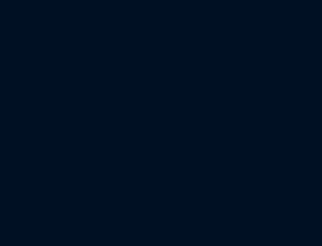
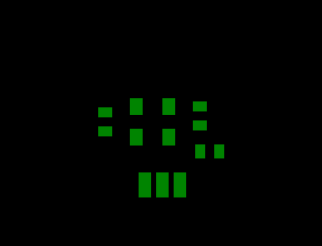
part: none -> (199, 115)
part: none -> (105, 121)
part: none -> (152, 121)
part: none -> (209, 151)
part: none -> (162, 184)

